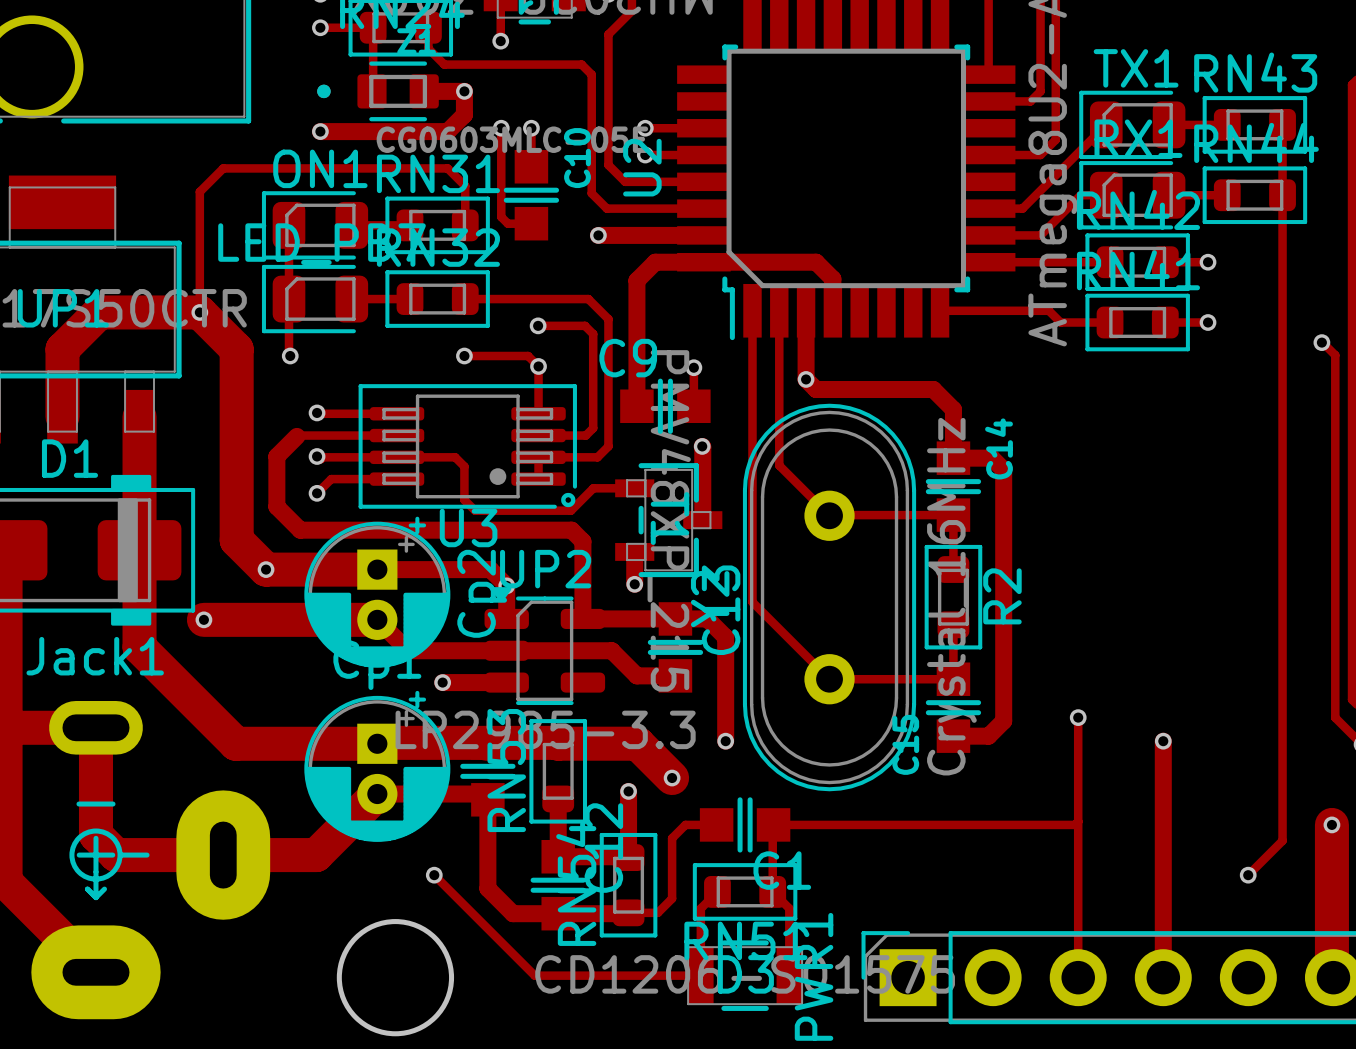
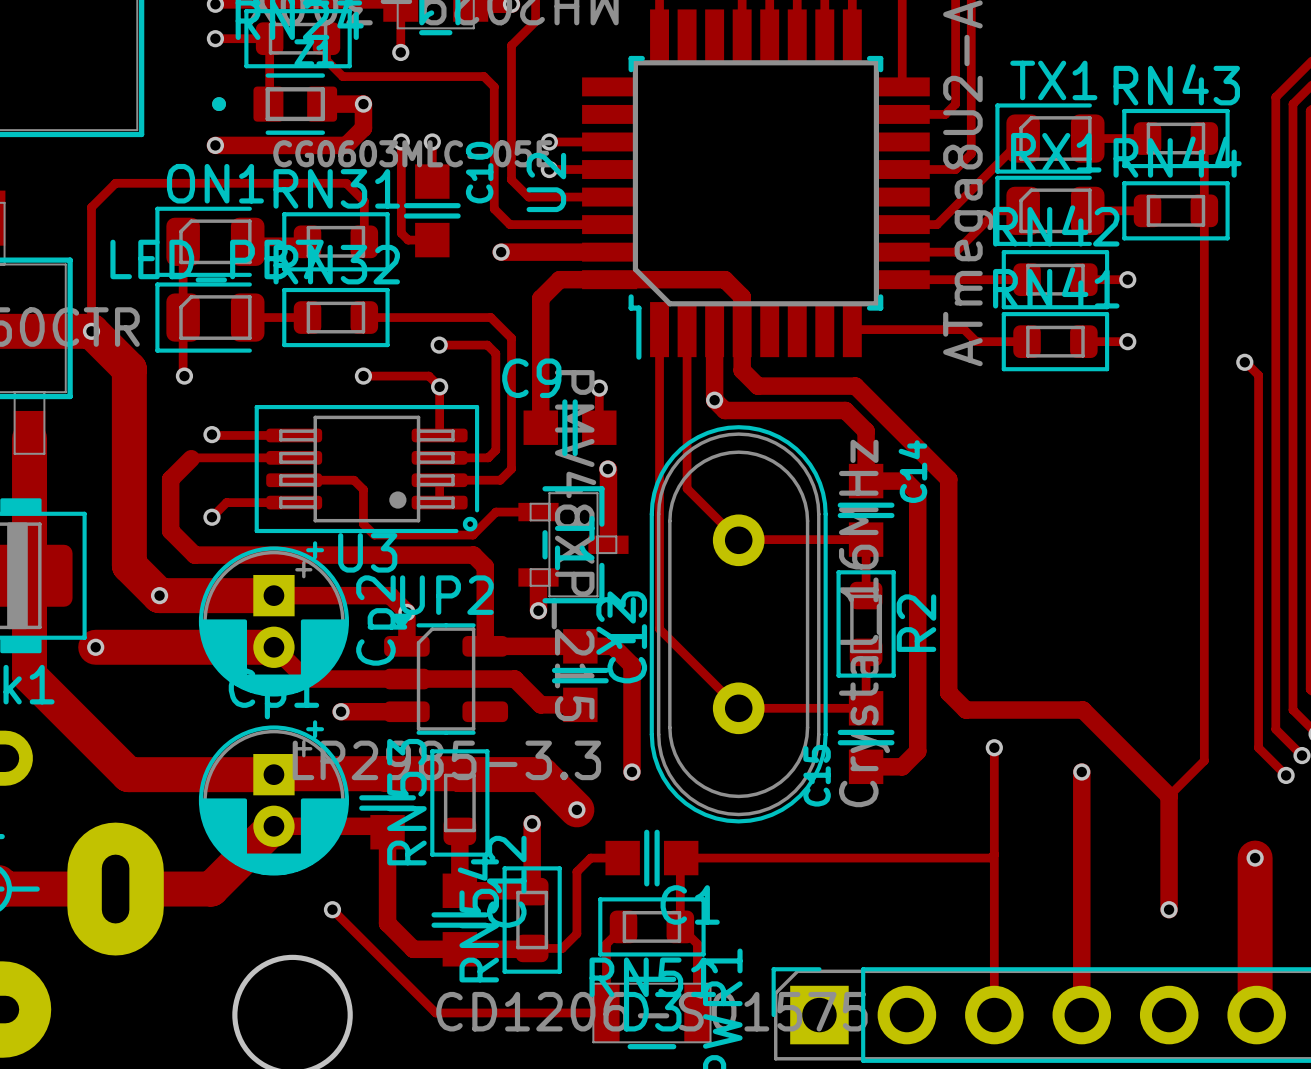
track: none -> (742, 329) (742, 370) (757, 386) (855, 386) (948, 479) (948, 692) (965, 710) (1082, 710) (1169, 796)
track: (317, 456) (319, 459) (322, 457) (397, 457) -> none
via: (317, 456) -> none
track: (1282, 730) (1282, 840) (1248, 875) -> (1169, 796) (1169, 909)
track: none -> (1204, 760) (1169, 796)

